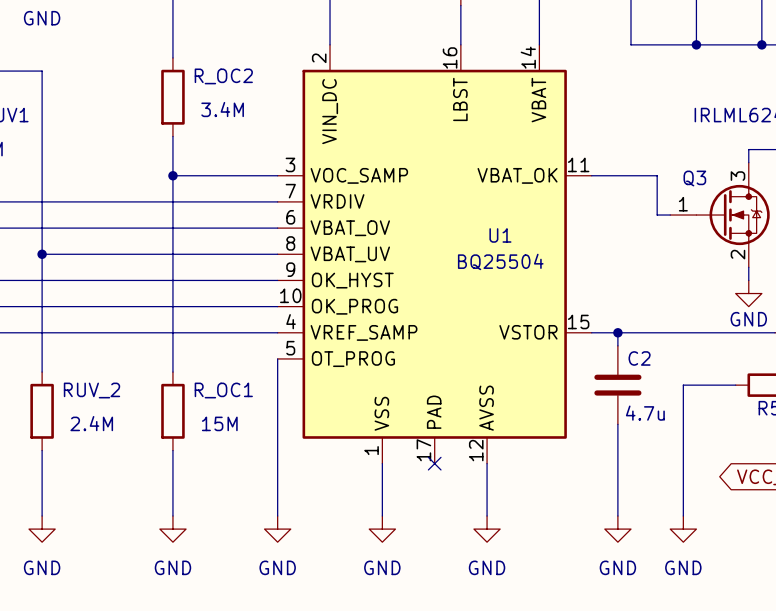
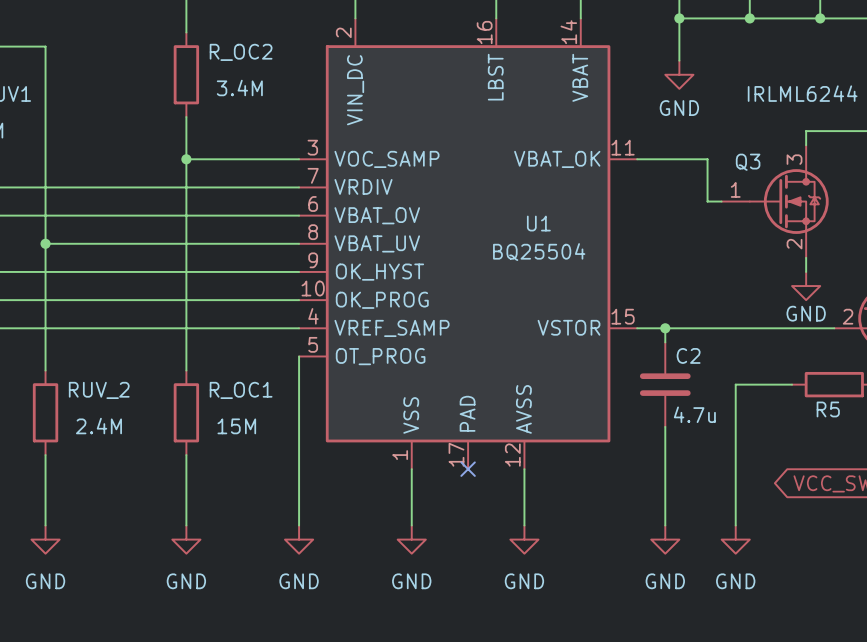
wire: none -> (679, 18) (679, 60)
junction: none -> (679, 18)
power symbol: none -> GND (679, 74)

